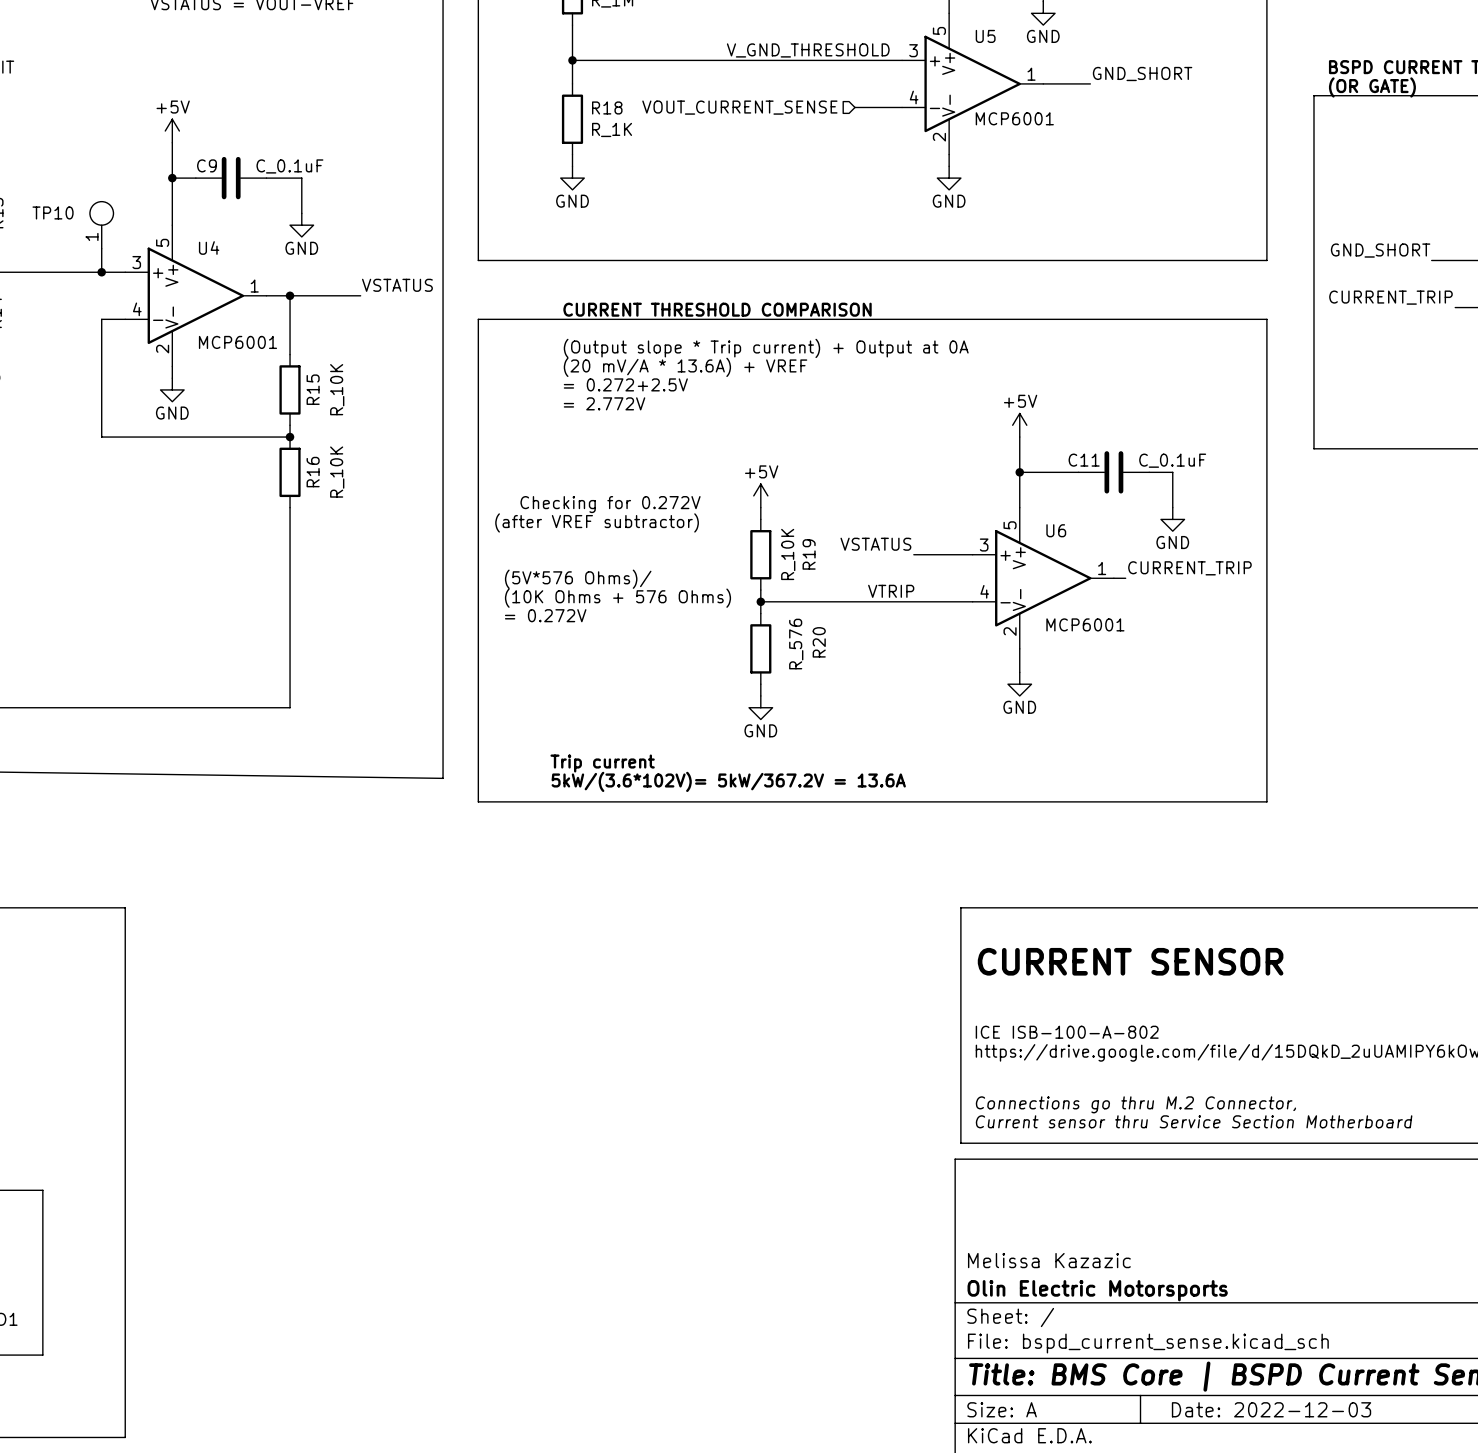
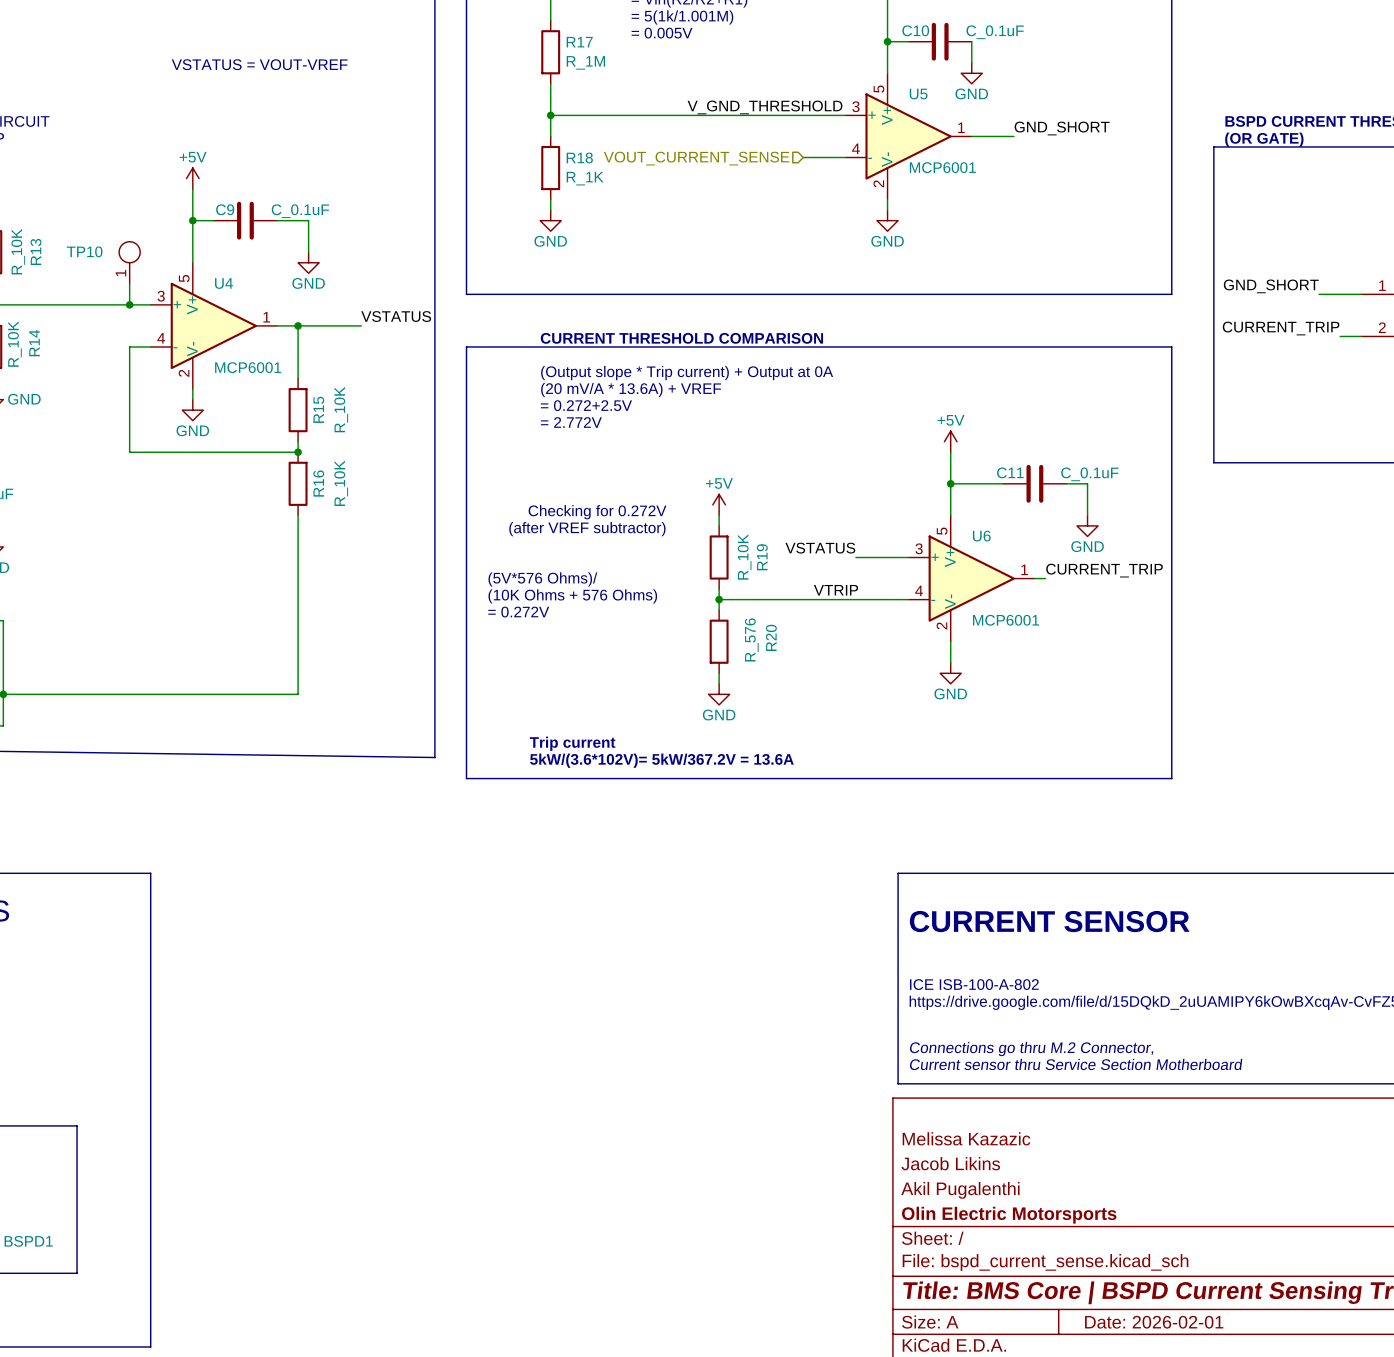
title block: none -> Melissa Kazazic (966, 1138)
title block: none -> Jacob Likins (950, 1163)
title block: Melissa Kazazic (1049, 1260) -> Akil Pugalenthi (960, 1190)
title block: Date: 2022-12-03 (1271, 1409) -> Date: 2026-02-01 (1154, 1322)

